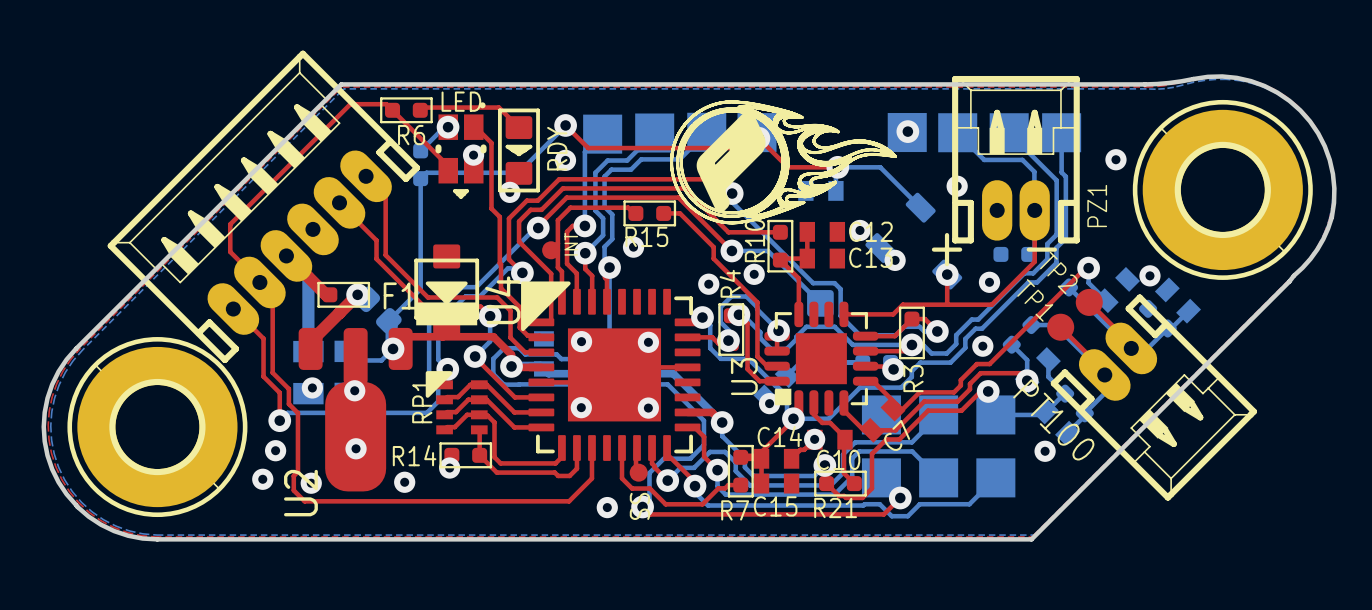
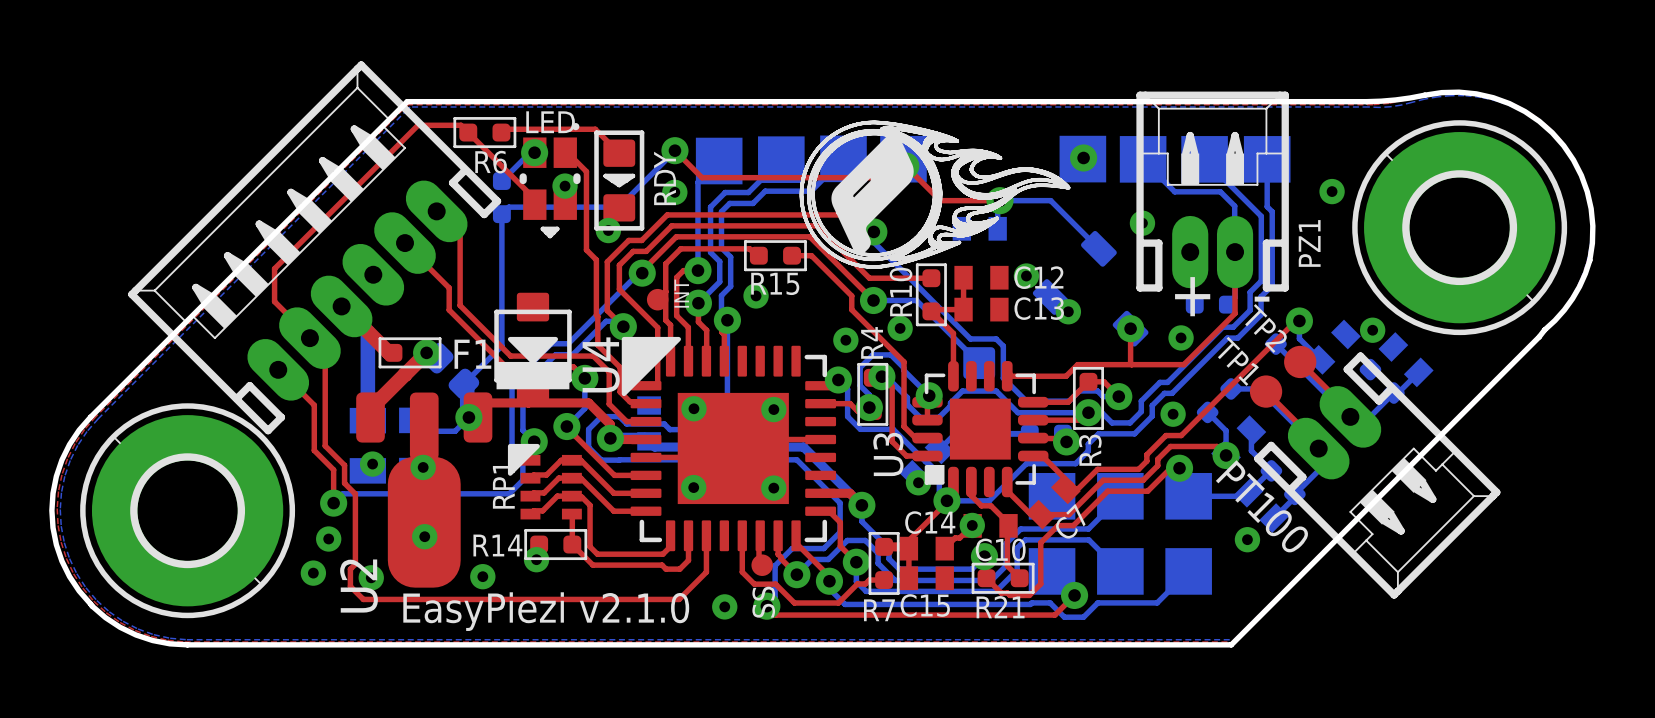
text: none -> EasyPiezi v2.1.0 (546, 611)

